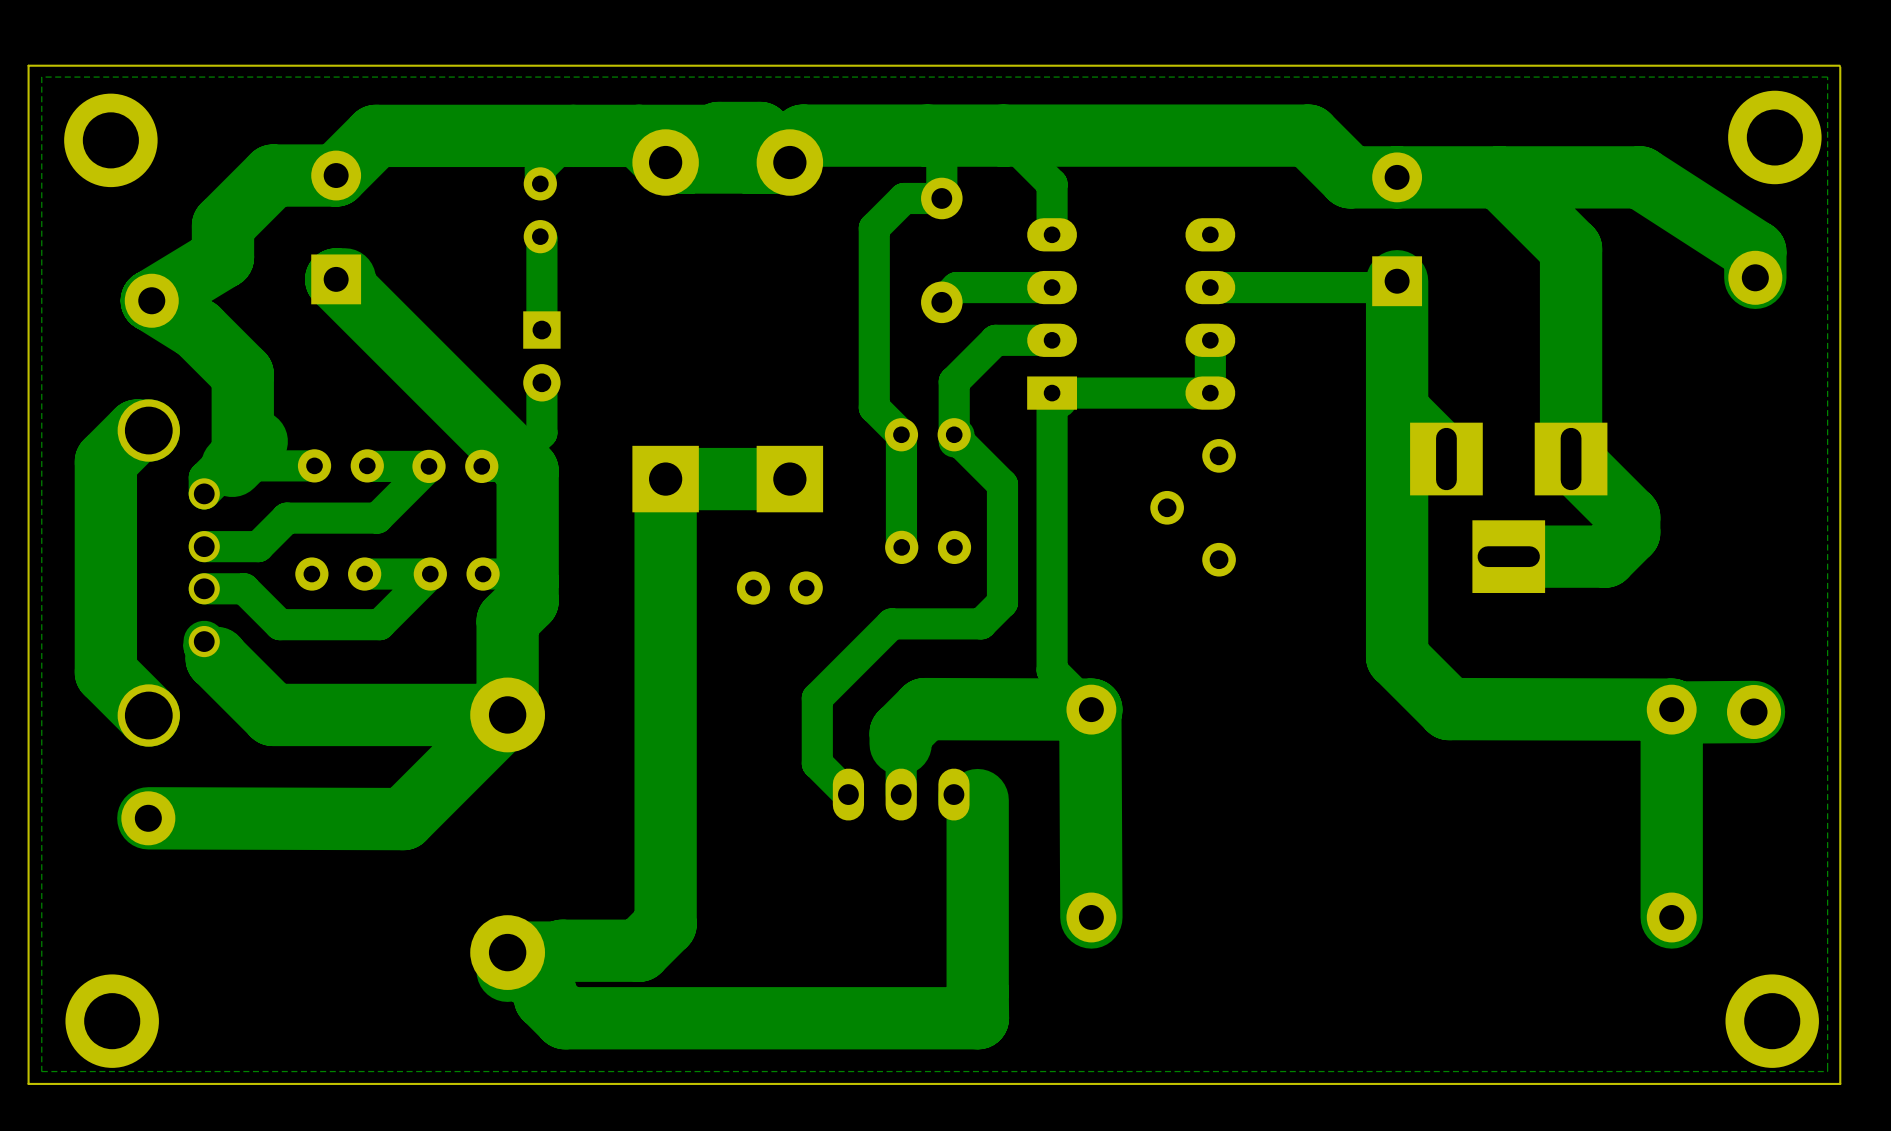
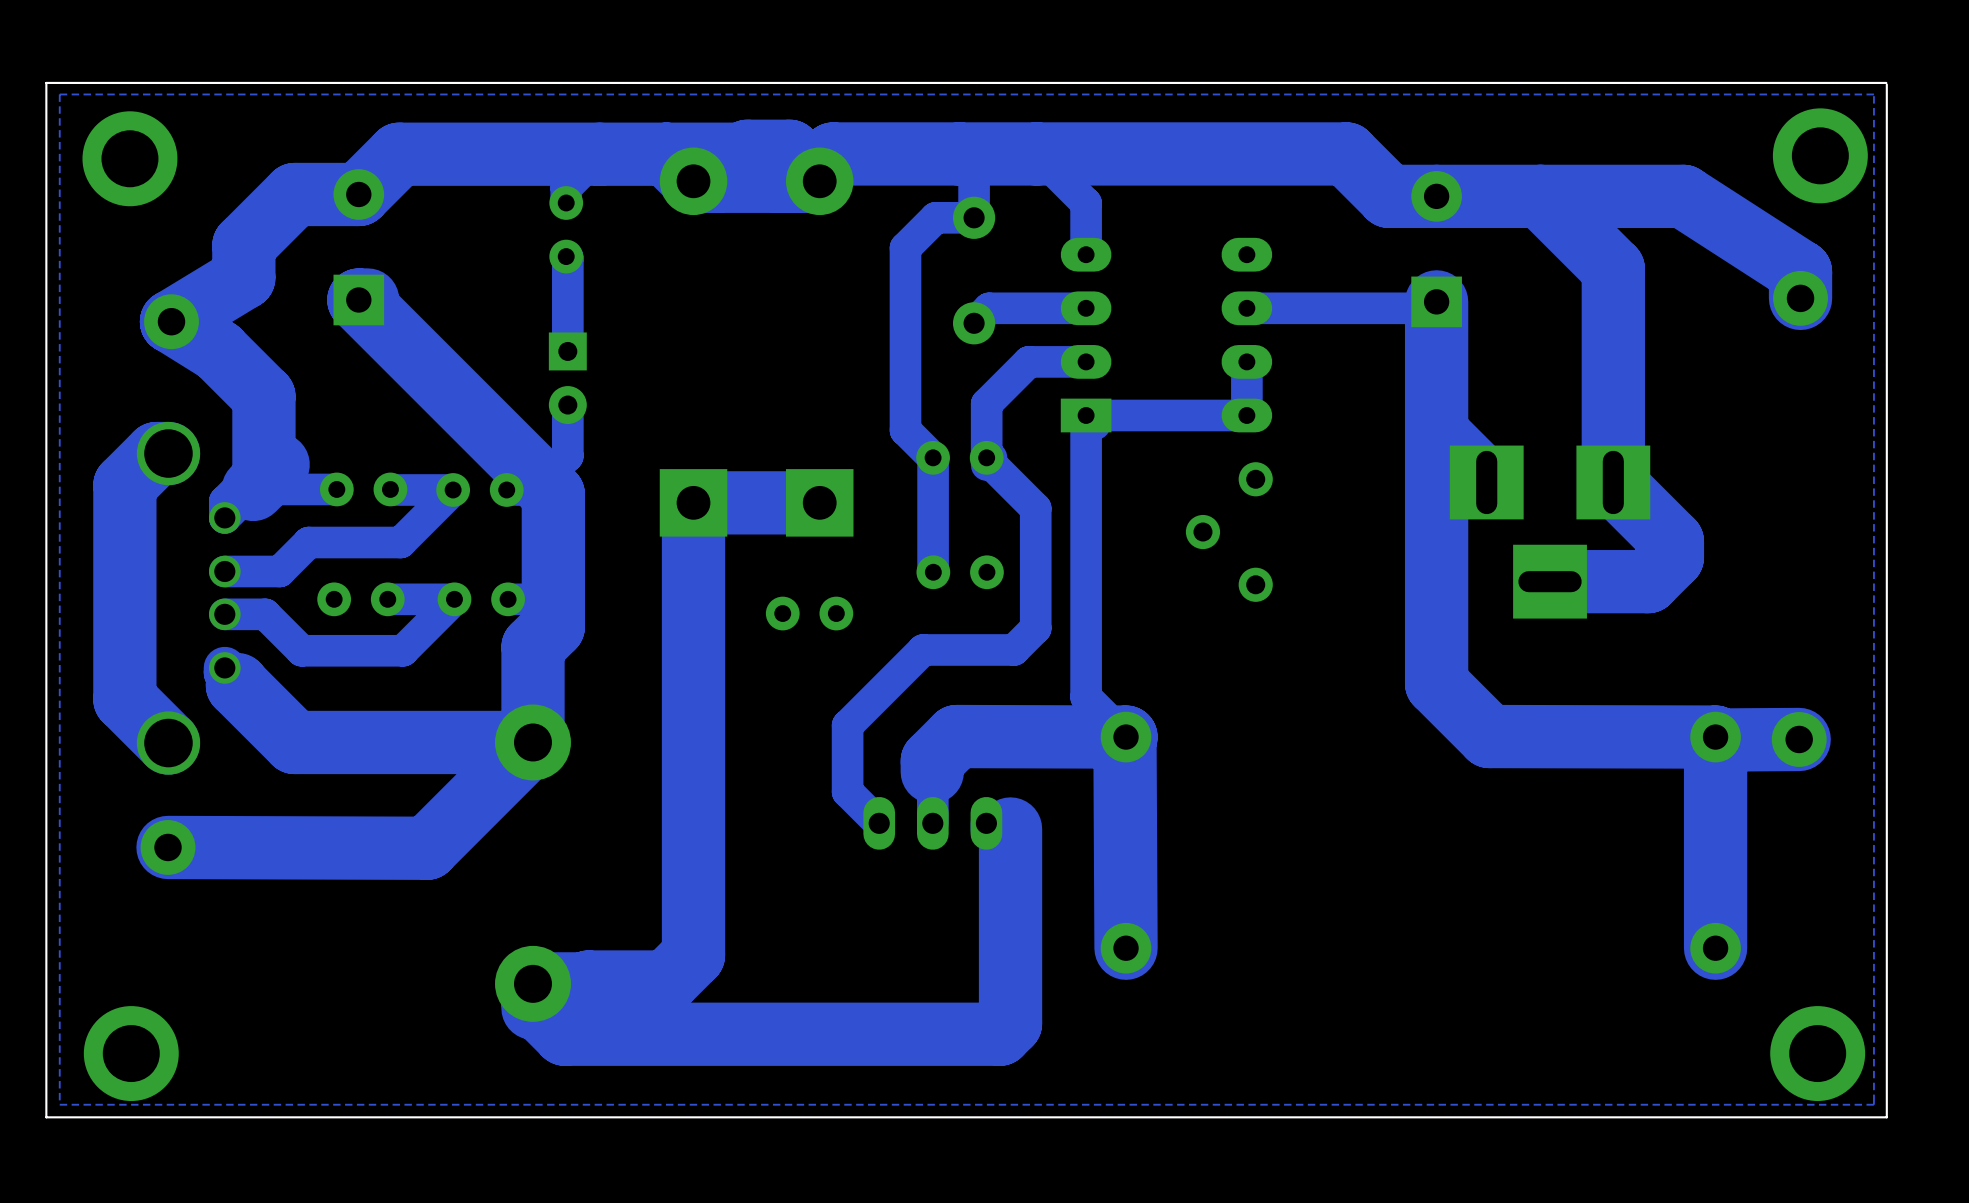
track: (507, 952) (545, 989) (545, 998) (565, 1018) (977, 1018) (977, 991) -> (533, 1008) (533, 1002) (564, 1034) (999, 1034) (1010, 1023)

